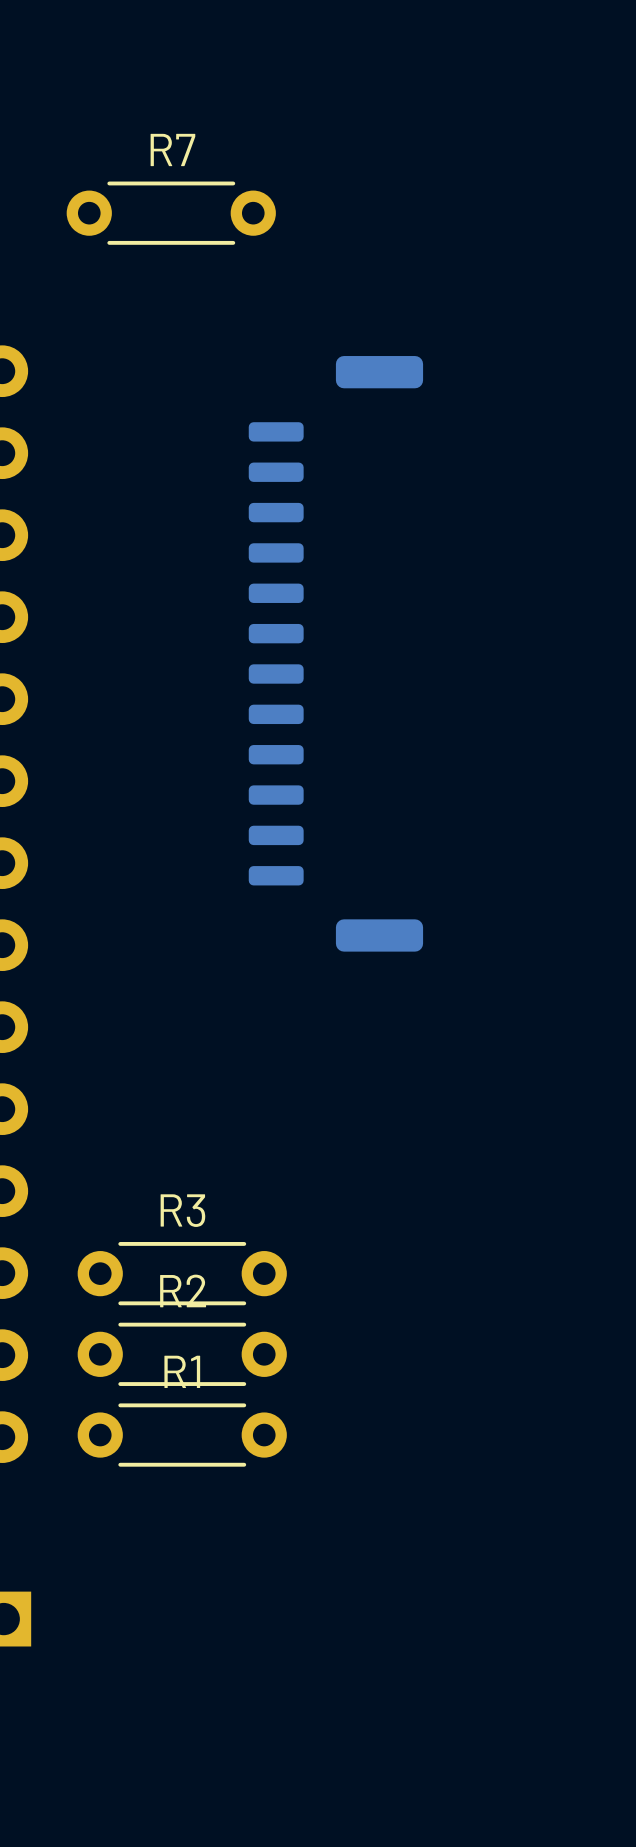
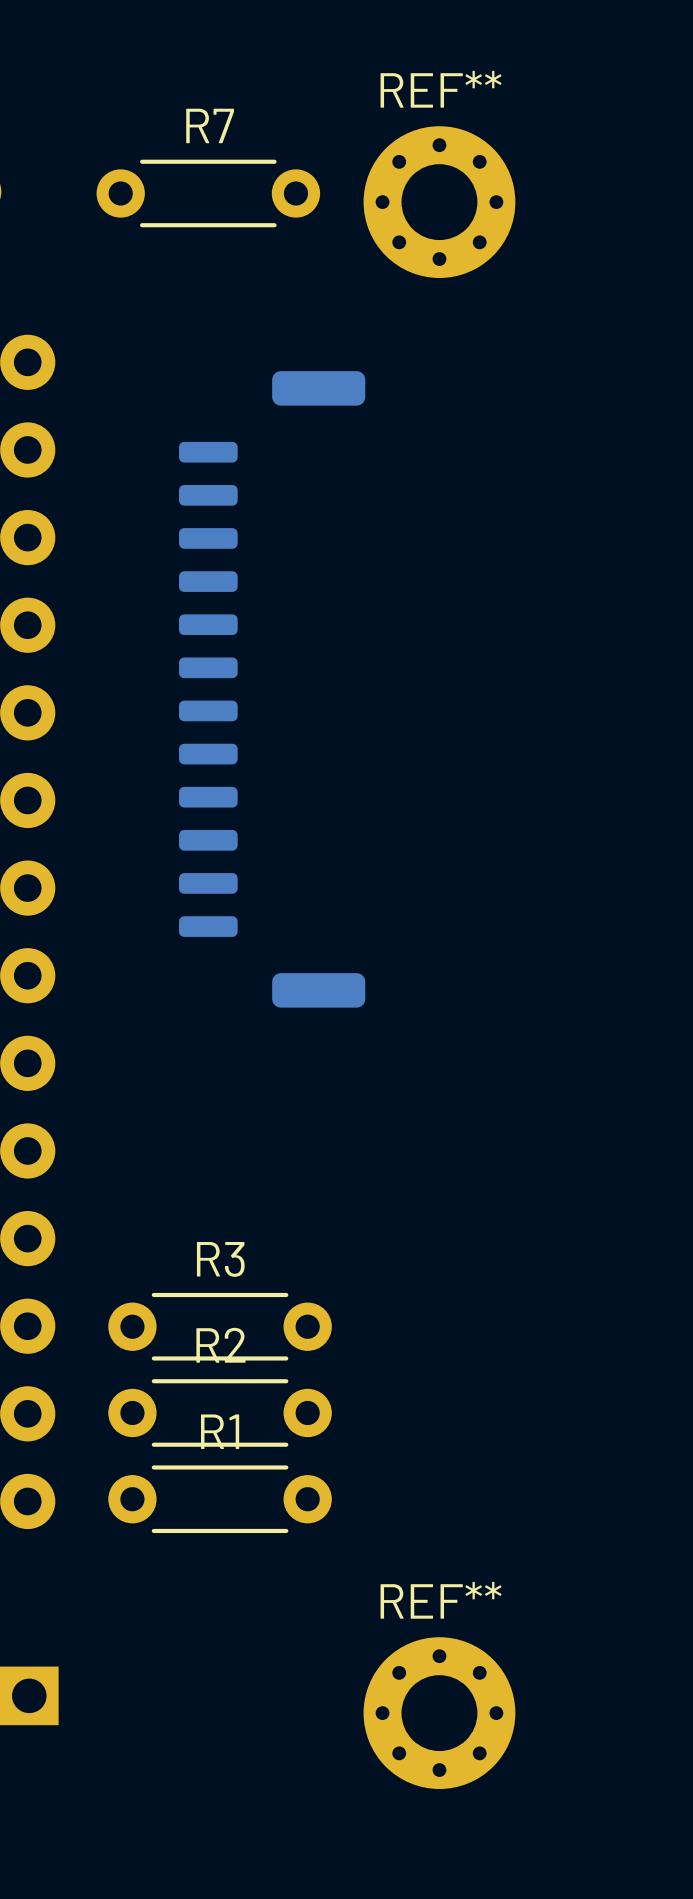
REF**: none -> (439, 202)
part position: (335, 653) -> (272, 689)
REF**: none -> (439, 1713)

